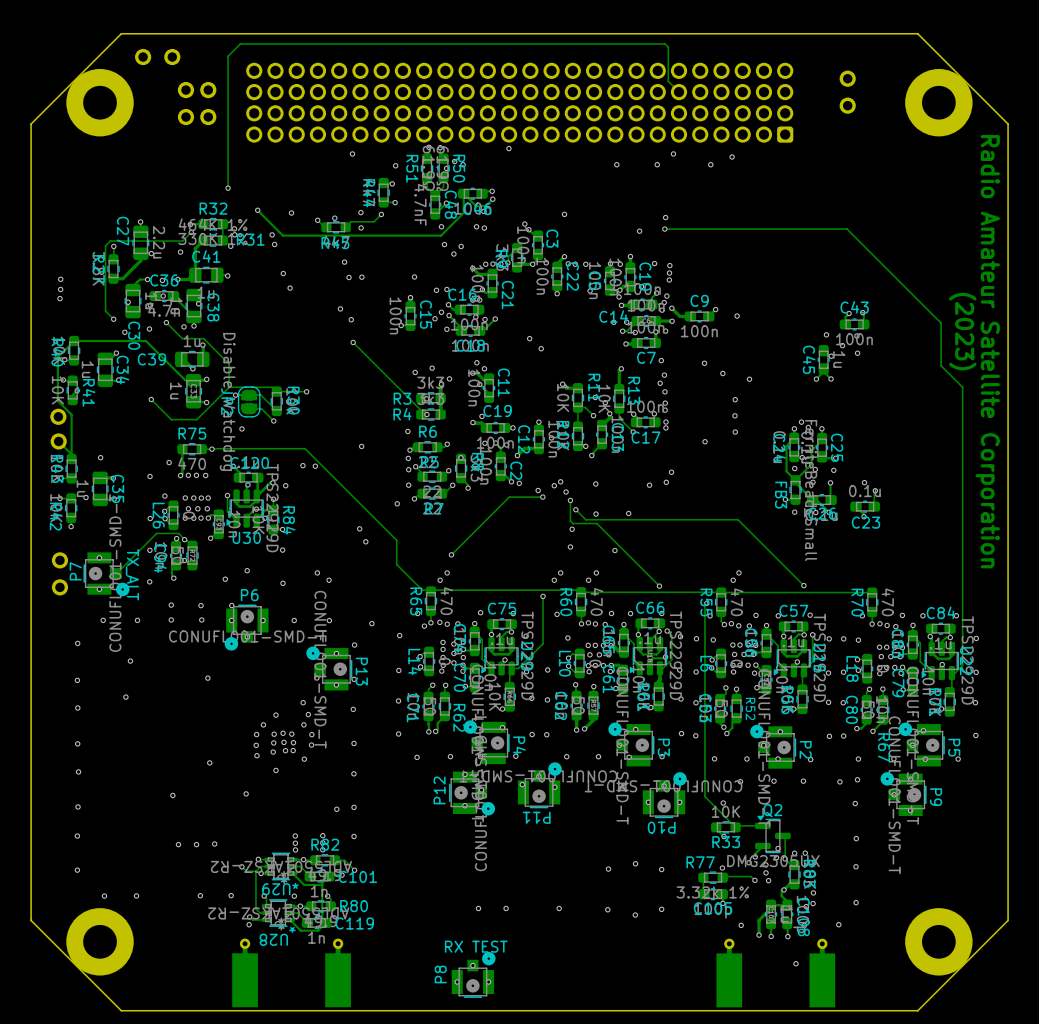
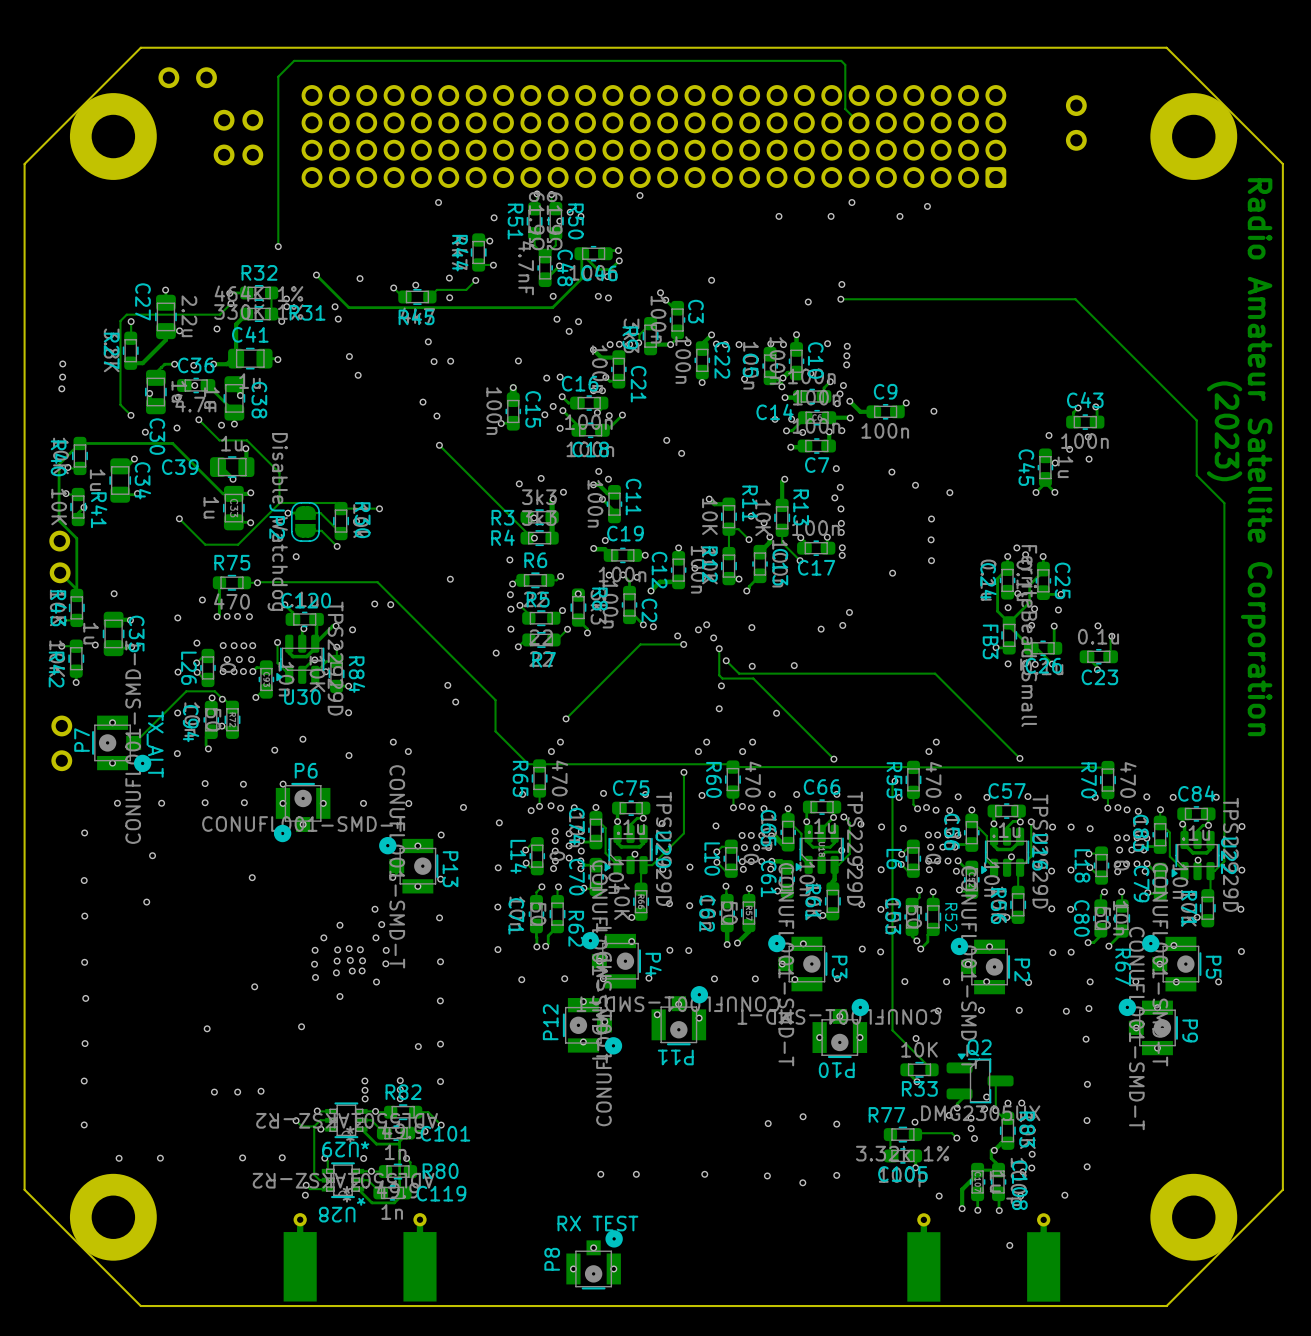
Q2 footprint: [755, 815, 791, 854] -> [946, 1053, 1014, 1104]
track: (762, 825) (735, 827) -> none

